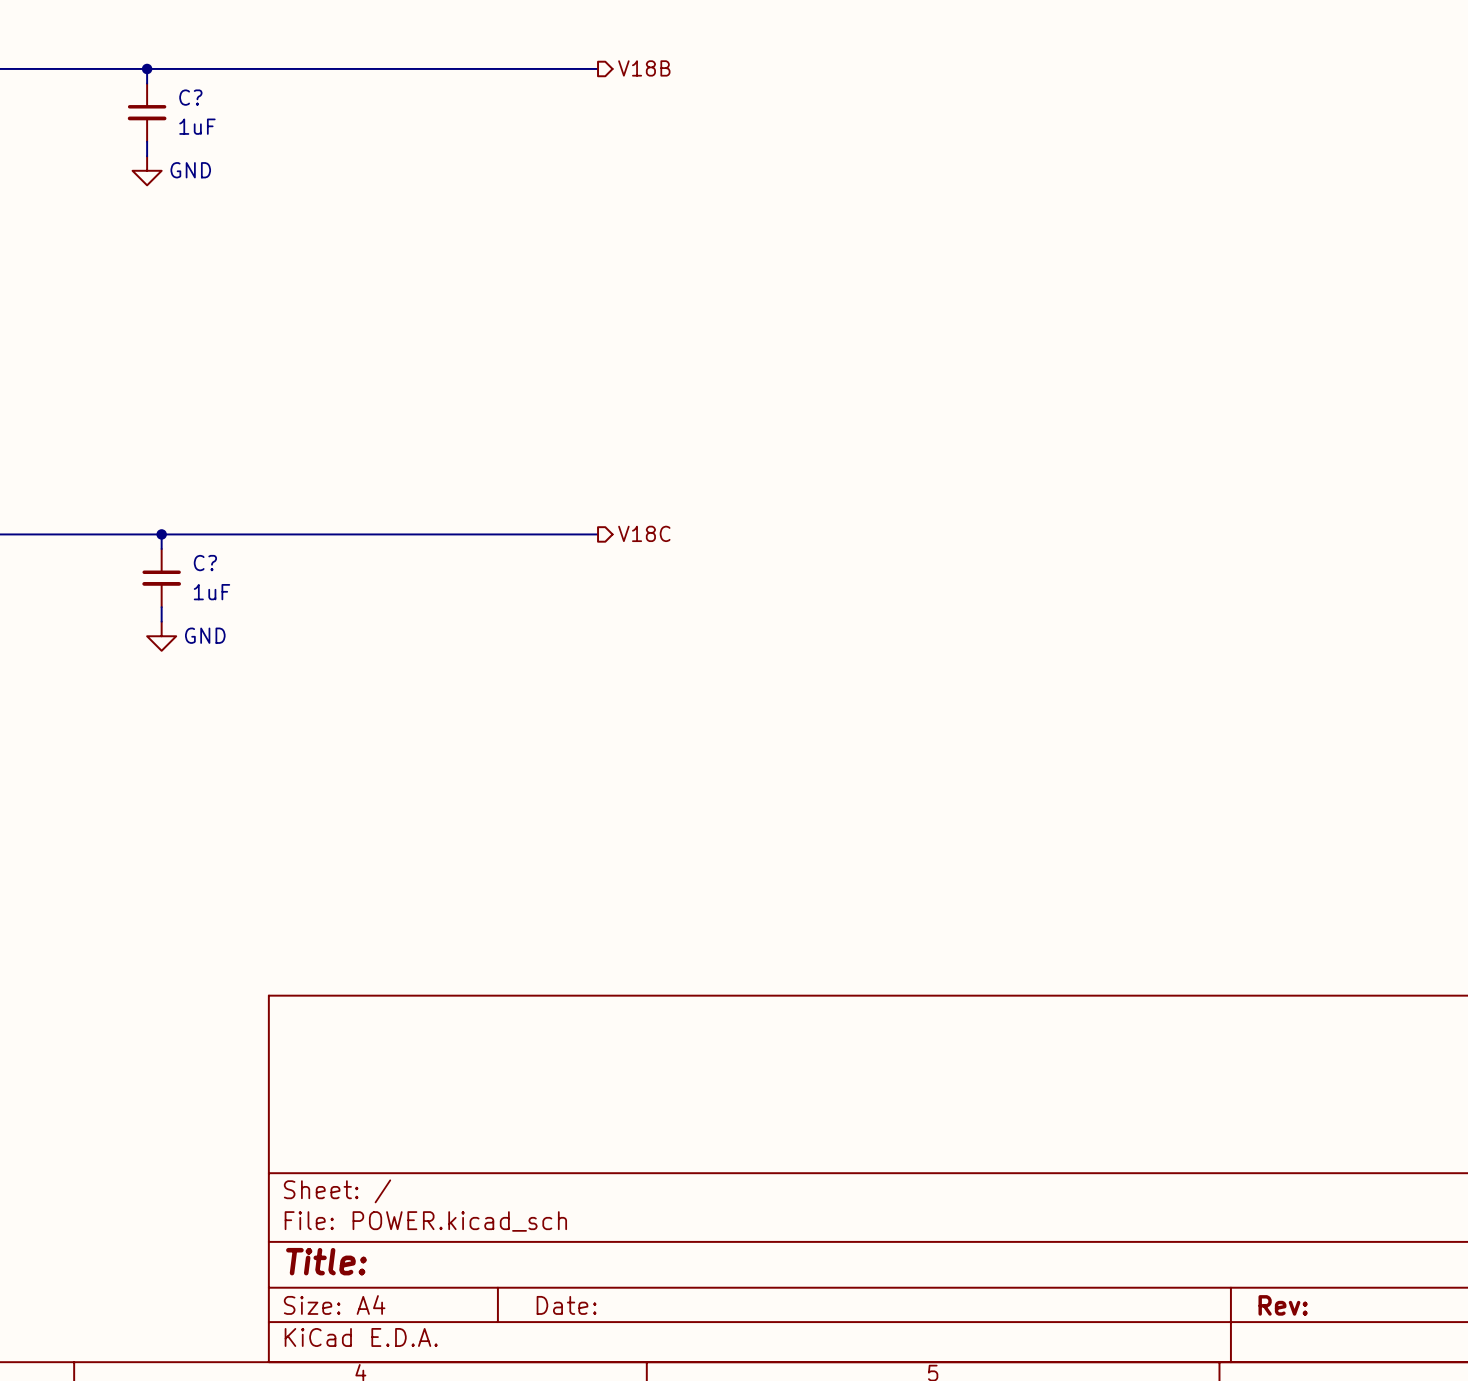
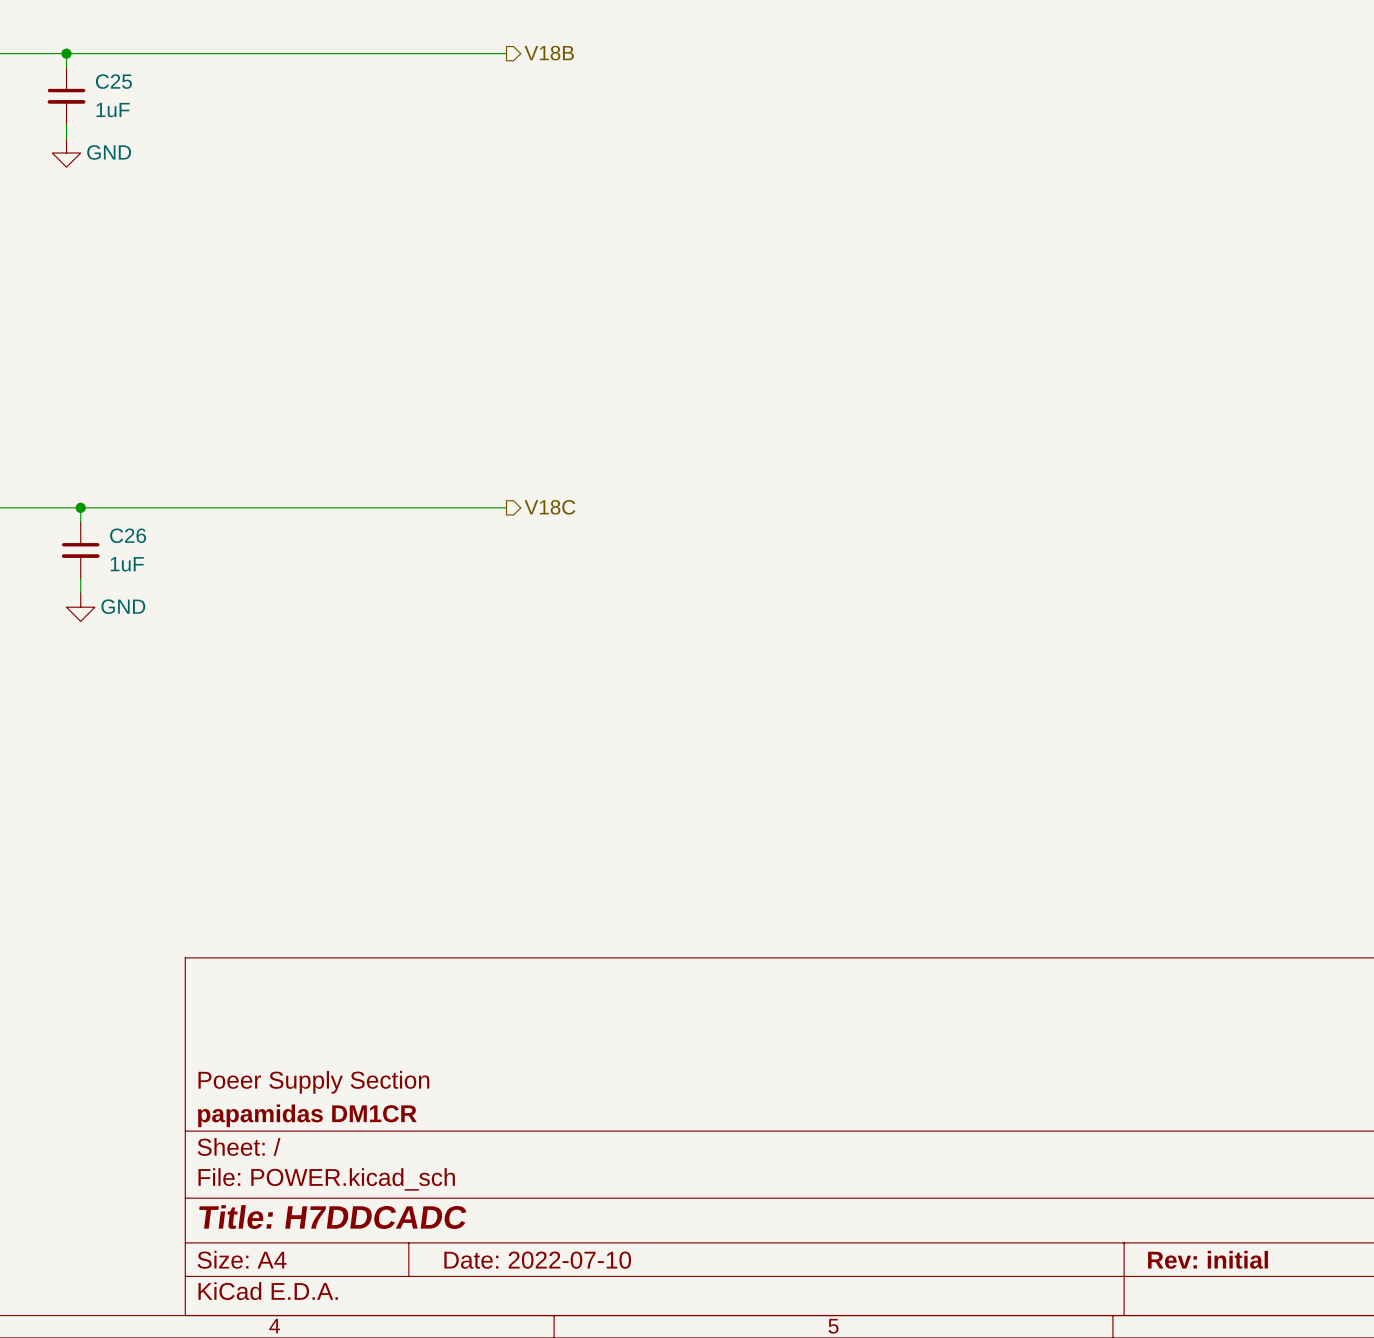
C? name: C? (190, 97) -> C25 (113, 81)
C? name: C? (205, 563) -> C26 (128, 535)
title block: none -> Poeer Supply Section (313, 1082)
title block: none -> papamidas DM1CR (307, 1115)
title block: Title: (326, 1261) -> Title: H7DDCADC (332, 1217)
title block: Date: (566, 1305) -> Date: 2022-07-10 (537, 1260)
title block: Rev: (1283, 1305) -> Rev: initial (1208, 1259)

